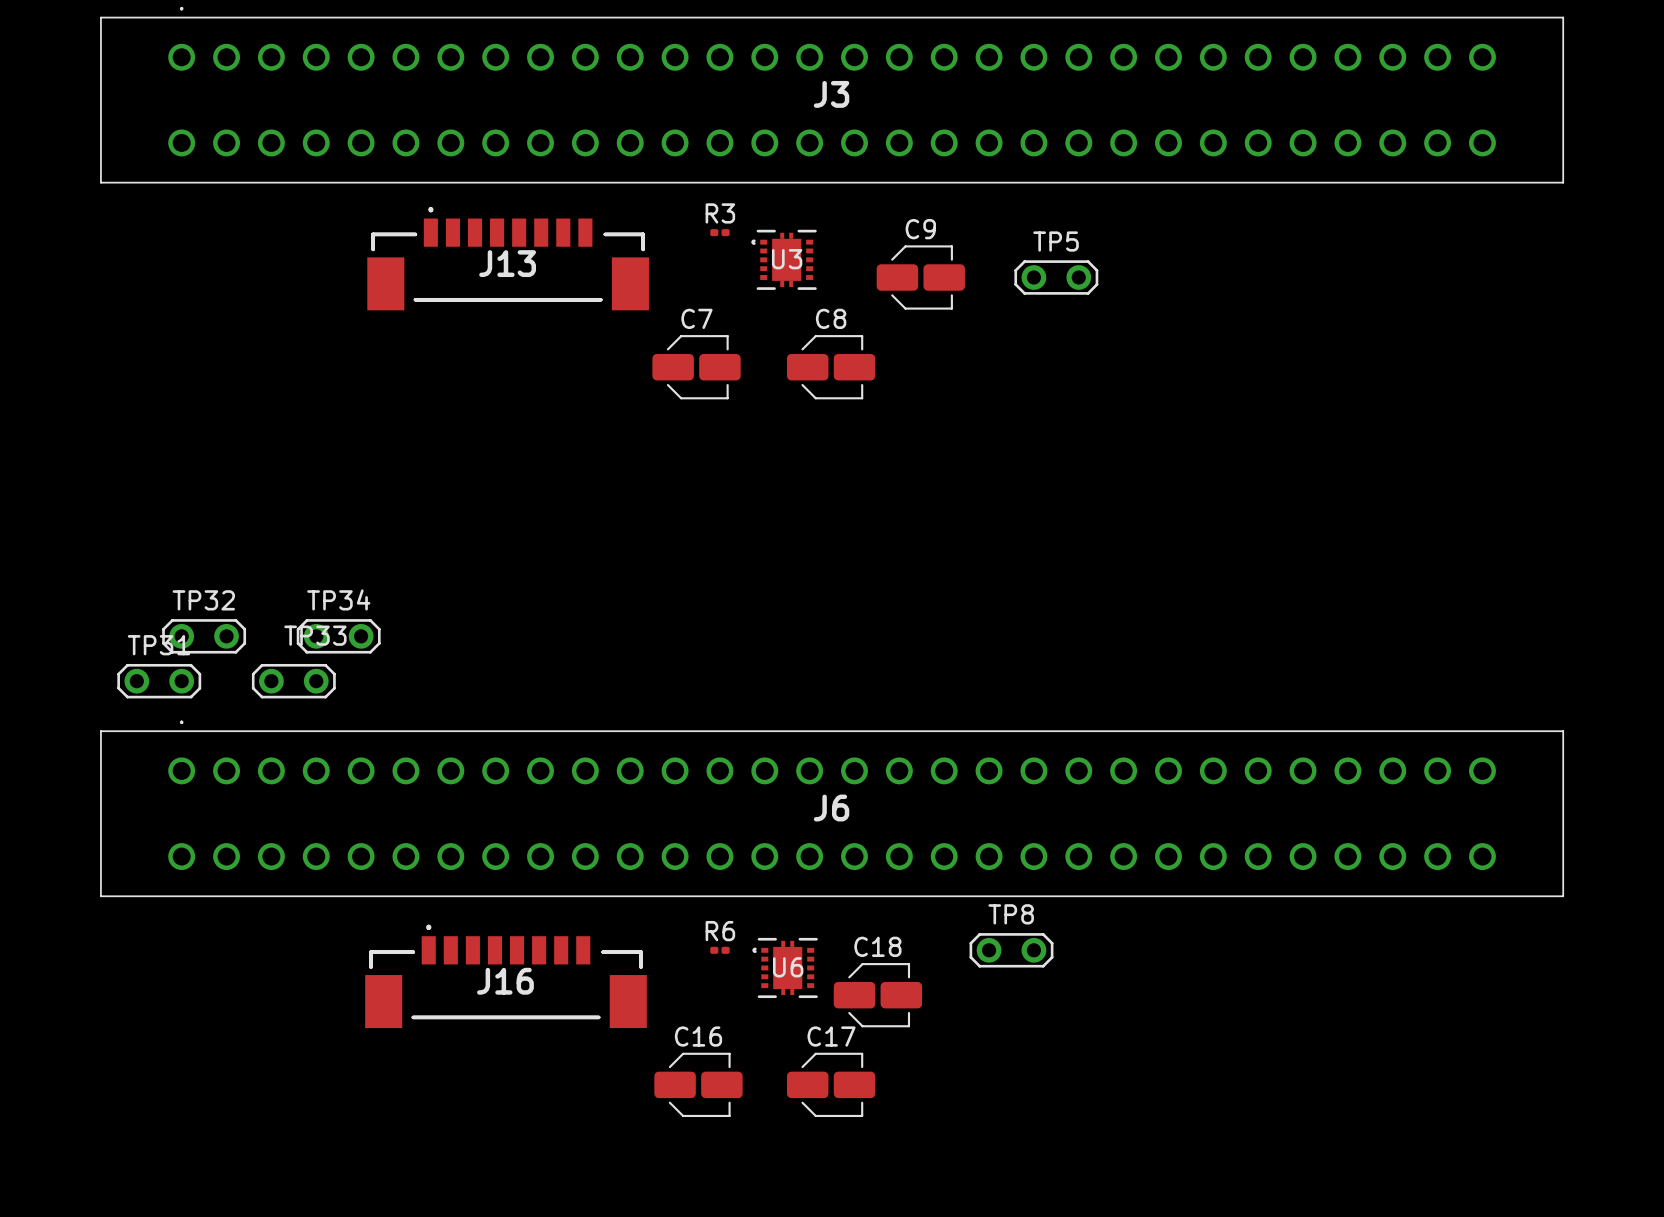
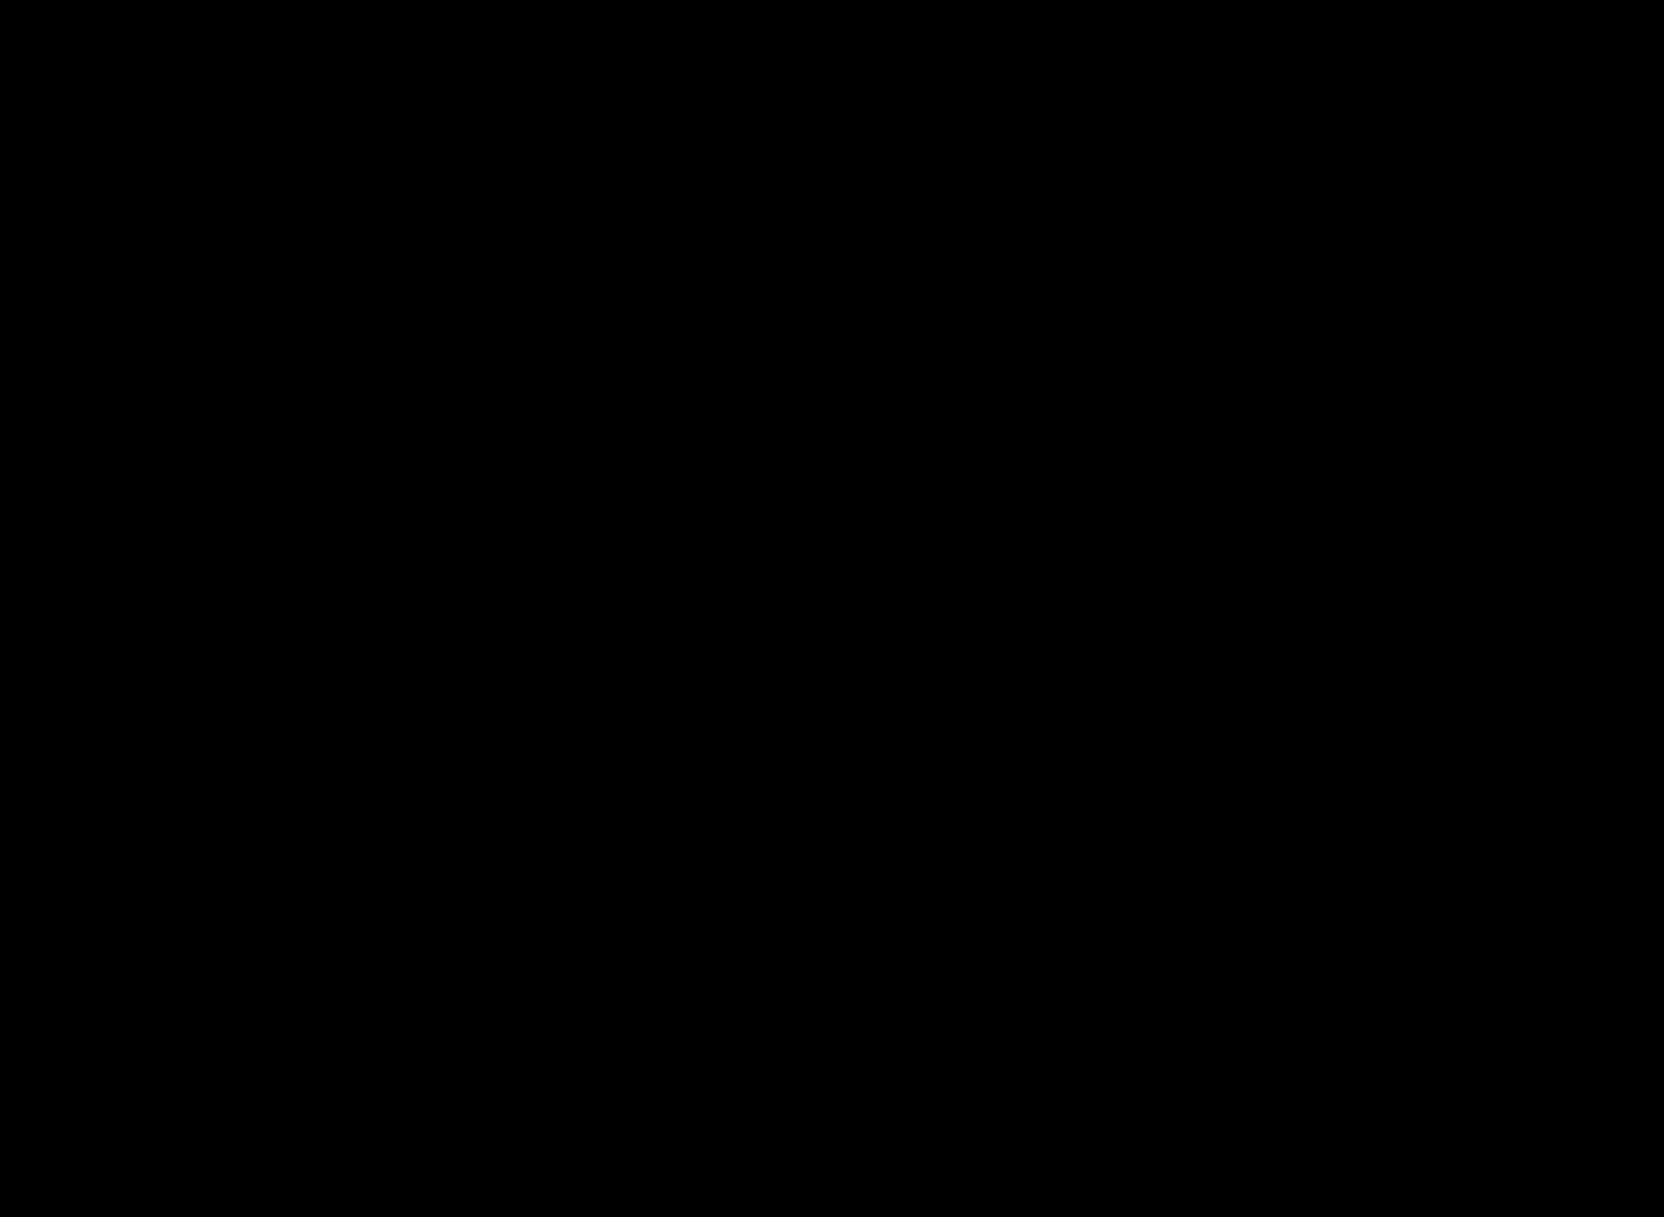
J3: (832, 95) -> none
R3: (719, 232) -> none
J13: (508, 258) -> none
U3: (784, 259) -> none
C9: (920, 277) -> none
TP5: (1056, 277) -> none
C7: (696, 367) -> none
C8: (831, 367) -> none
TP32: (204, 636) -> none
TP34: (338, 636) -> none
TP31: (159, 681) -> none
TP33: (293, 681) -> none
J6: (832, 808) -> none
R6: (719, 950) -> none
TP8: (1011, 950) -> none
U6: (785, 967) -> none
J16: (506, 976) -> none
C18: (877, 995) -> none
C16: (698, 1084) -> none
C17: (831, 1084) -> none

